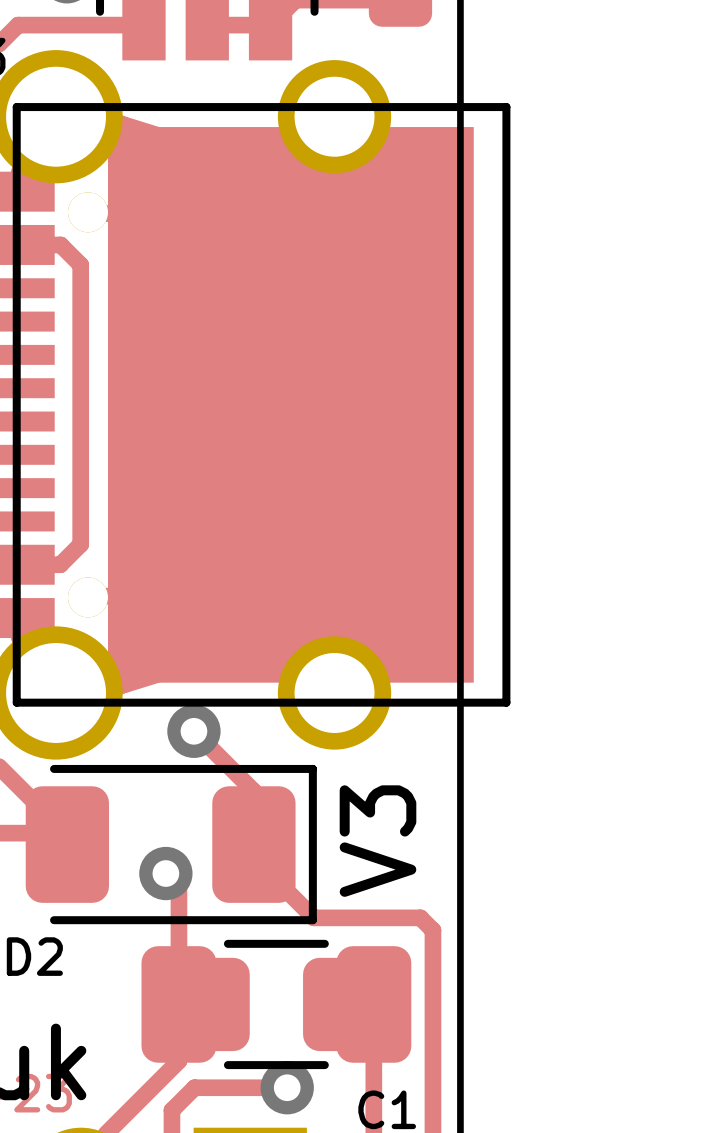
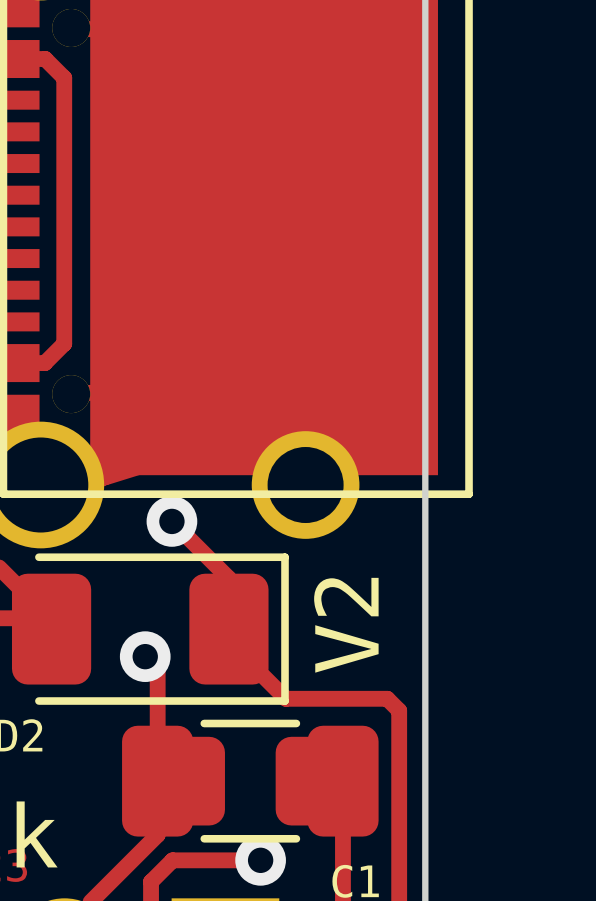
text: V3 (378, 841) -> V2 (346, 625)

